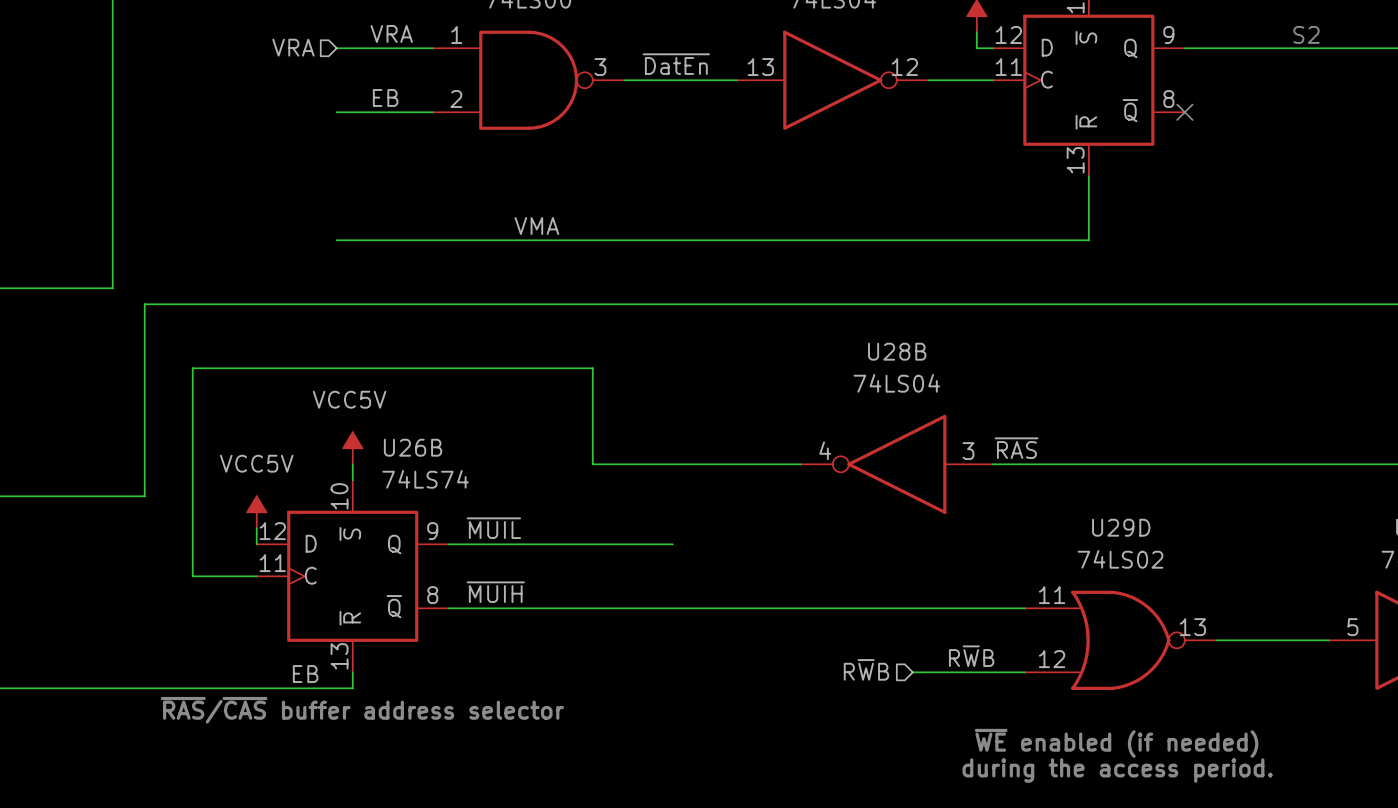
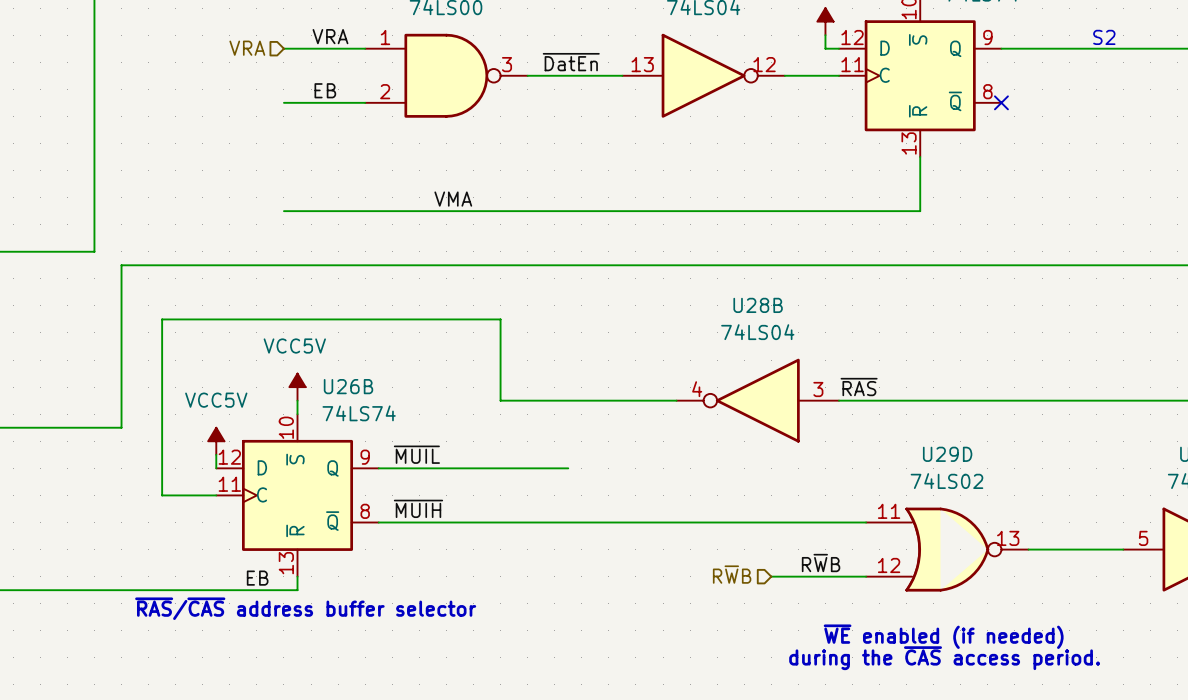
text: ~{RAS}/~{CAS} buffer address selector (362, 710) -> ~{RAS}/~{CAS} address buffer selector (305, 608)
text: during the access period. (1117, 770) -> during the ~{CAS} access period. (944, 658)

